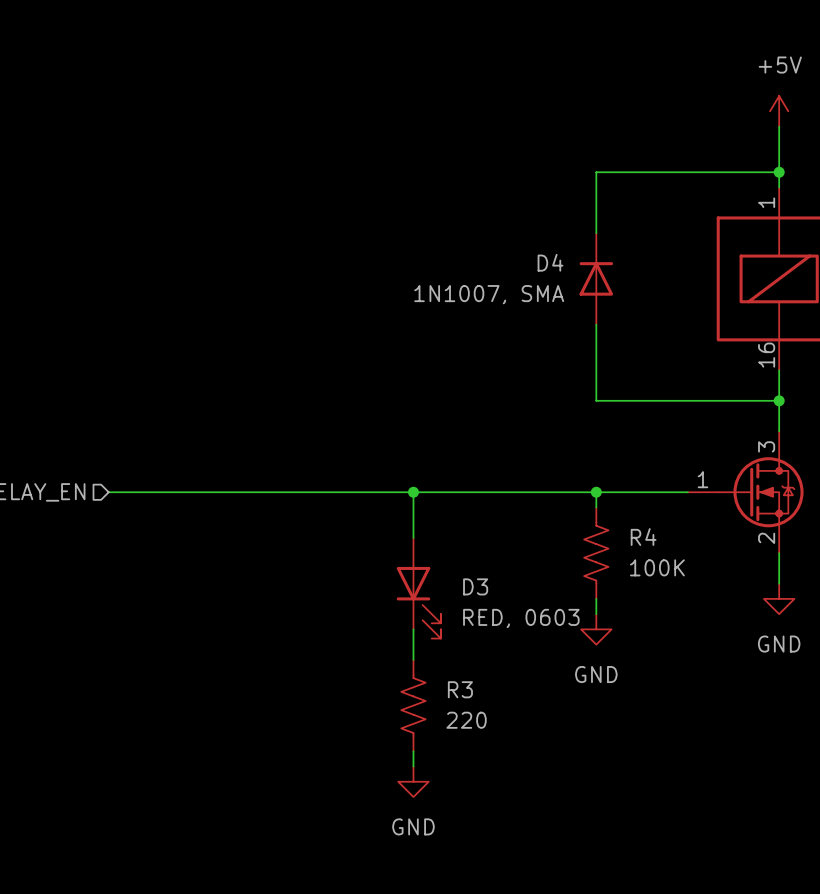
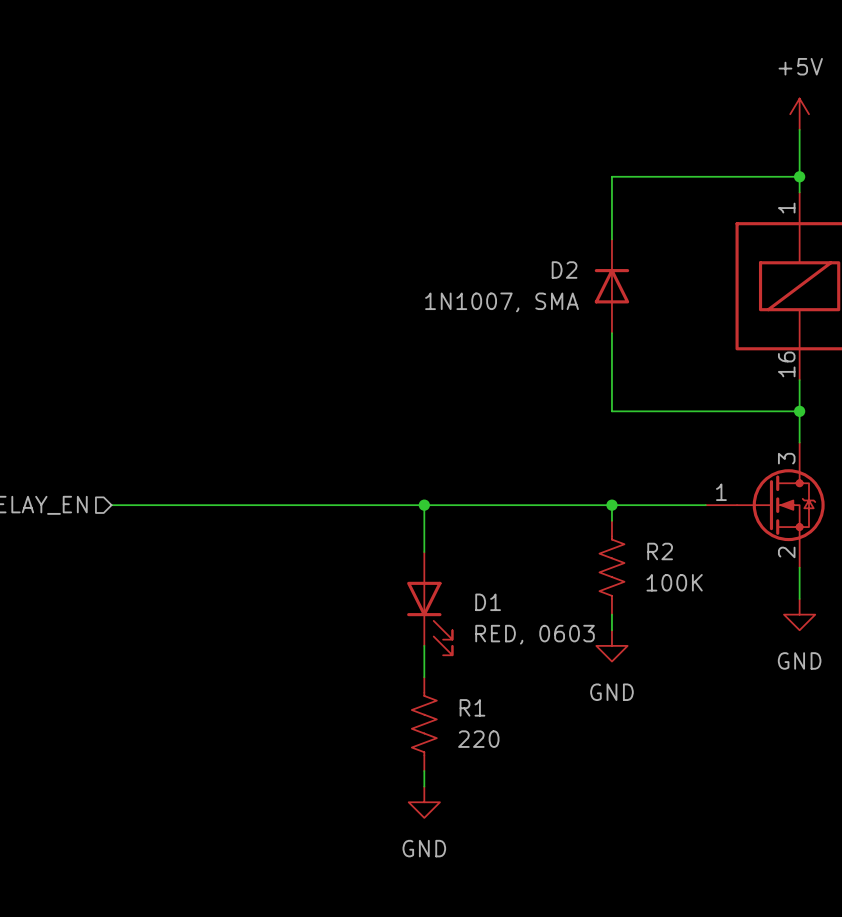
D4 name: D4 (550, 262) -> D2 (564, 270)
R4 name: R4 (643, 537) -> R2 (660, 551)
D3 name: D3 (475, 586) -> D1 (488, 602)
R3 name: R3 (460, 689) -> R1 (472, 707)

